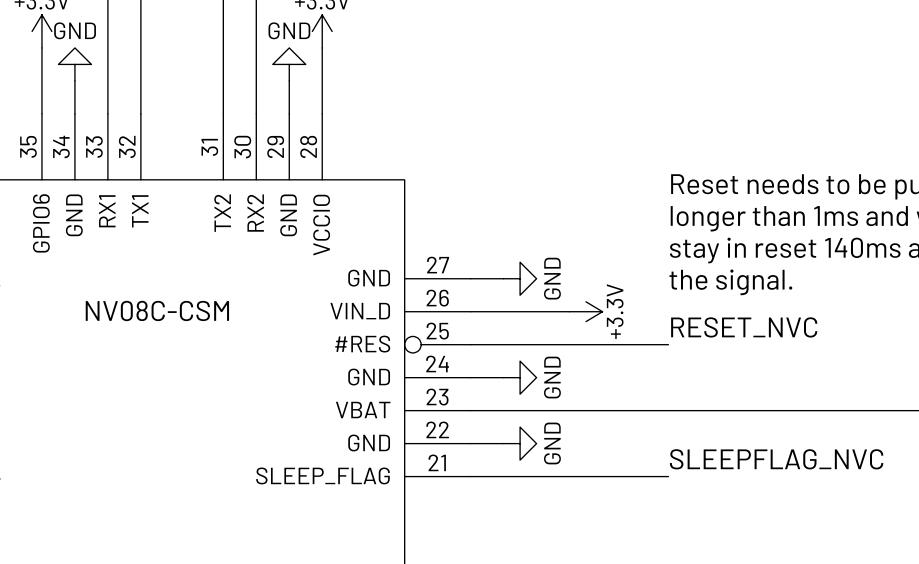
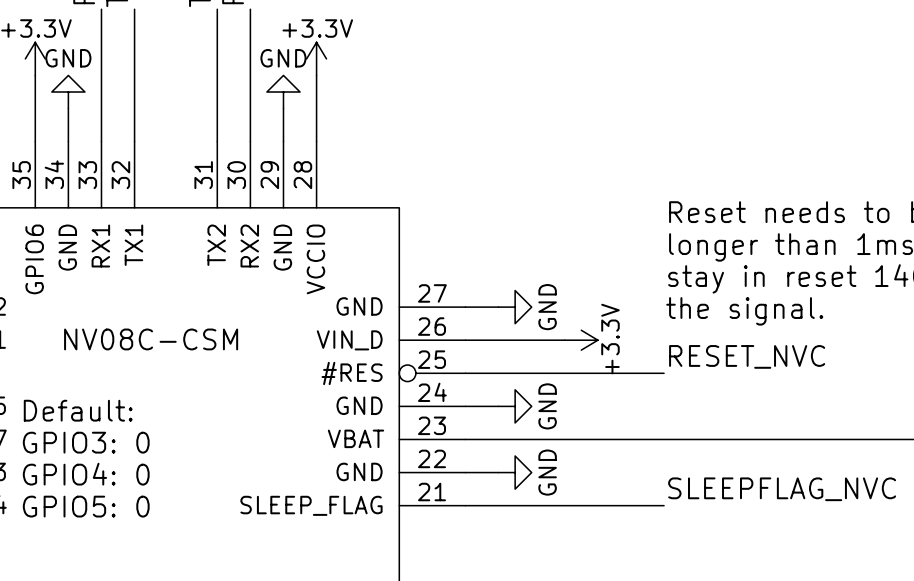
text: none -> Default: (78, 410)
text: none -> GPIO3: 0 (86, 442)
text: none -> GPIO4: 0 (86, 474)
text: none -> GPIO5: 0 (86, 506)

